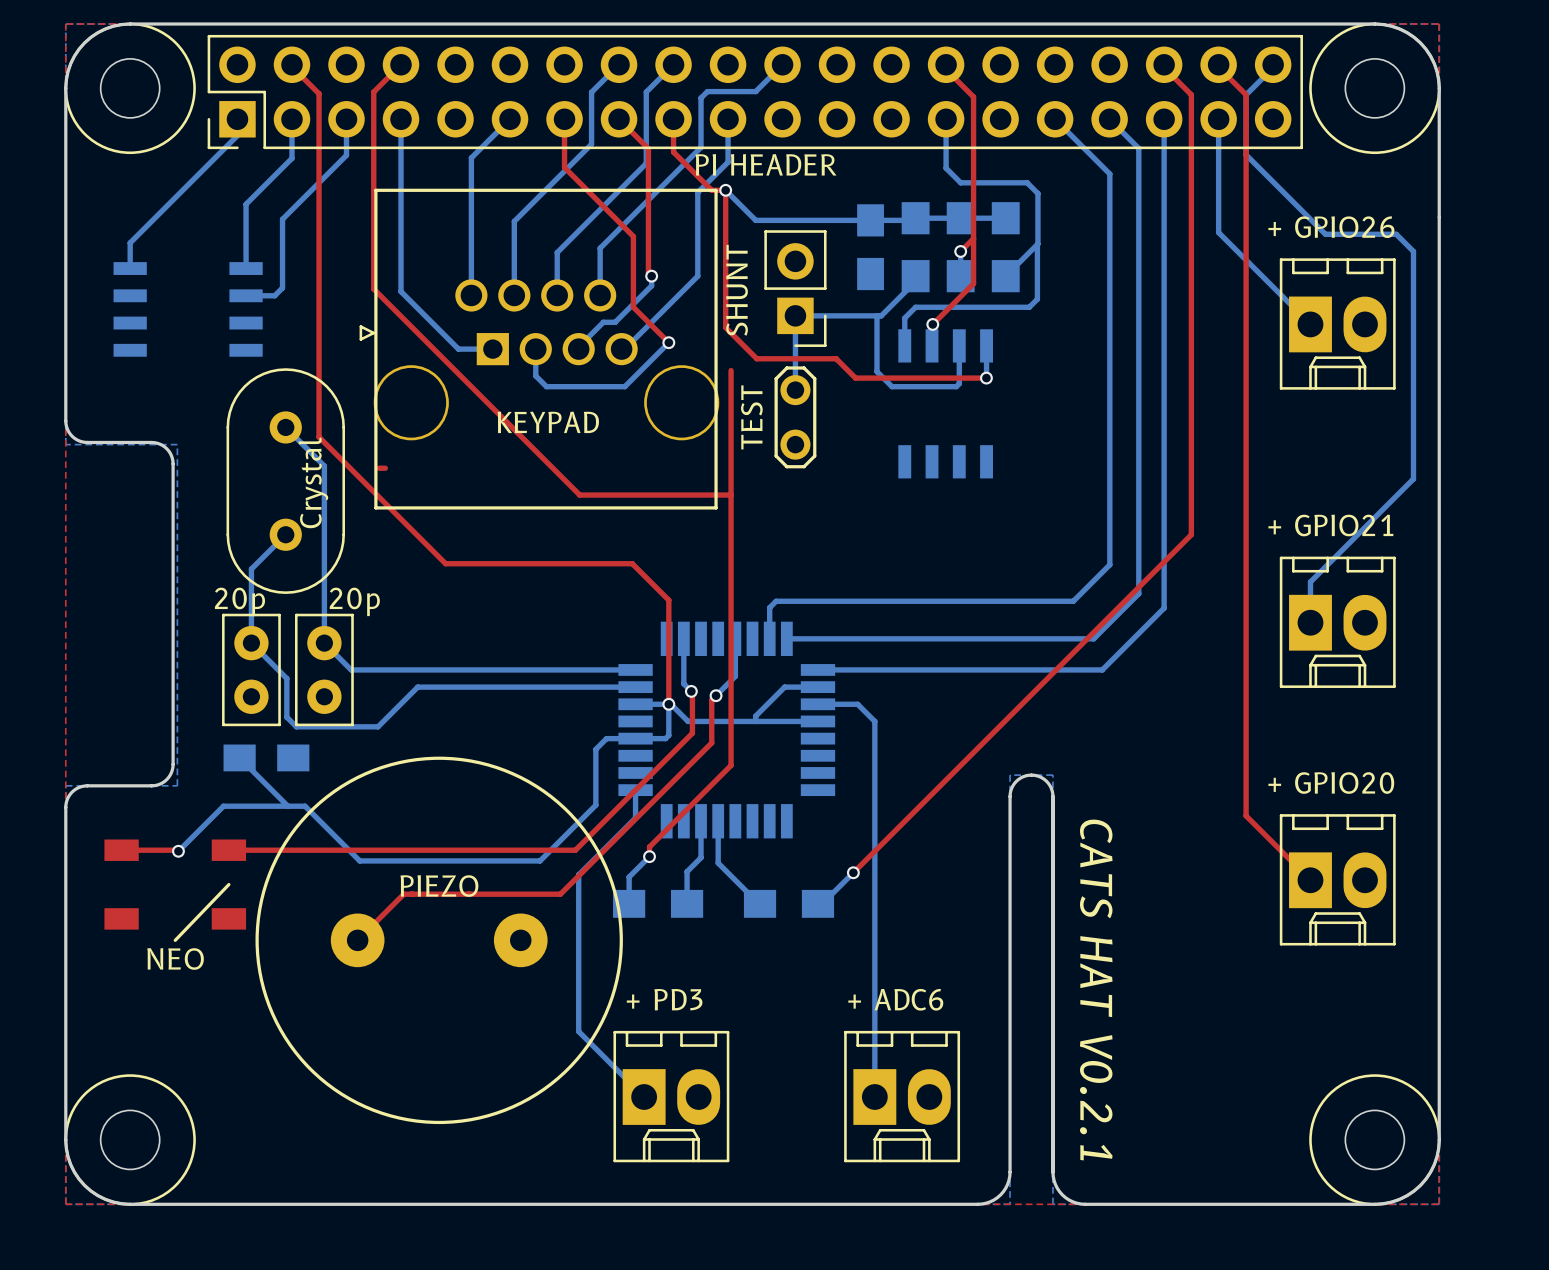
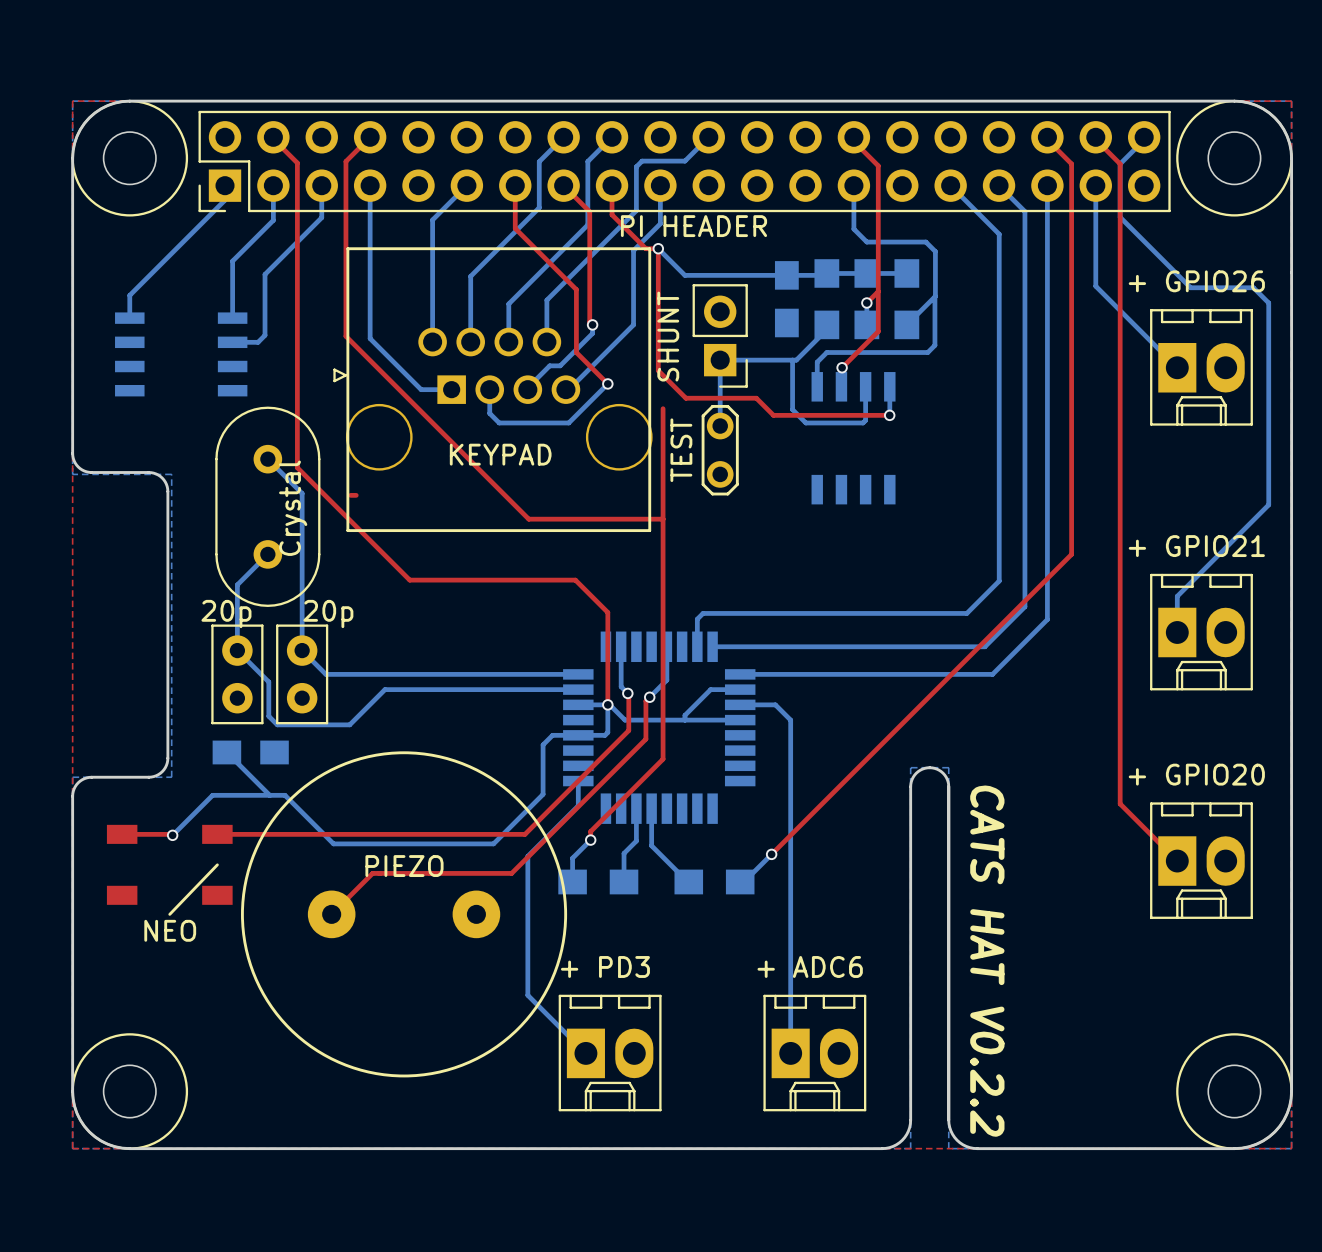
text: CATS HAT V0.2.1 (1096, 989) -> CATS HAT V0.2.2 (987, 961)

